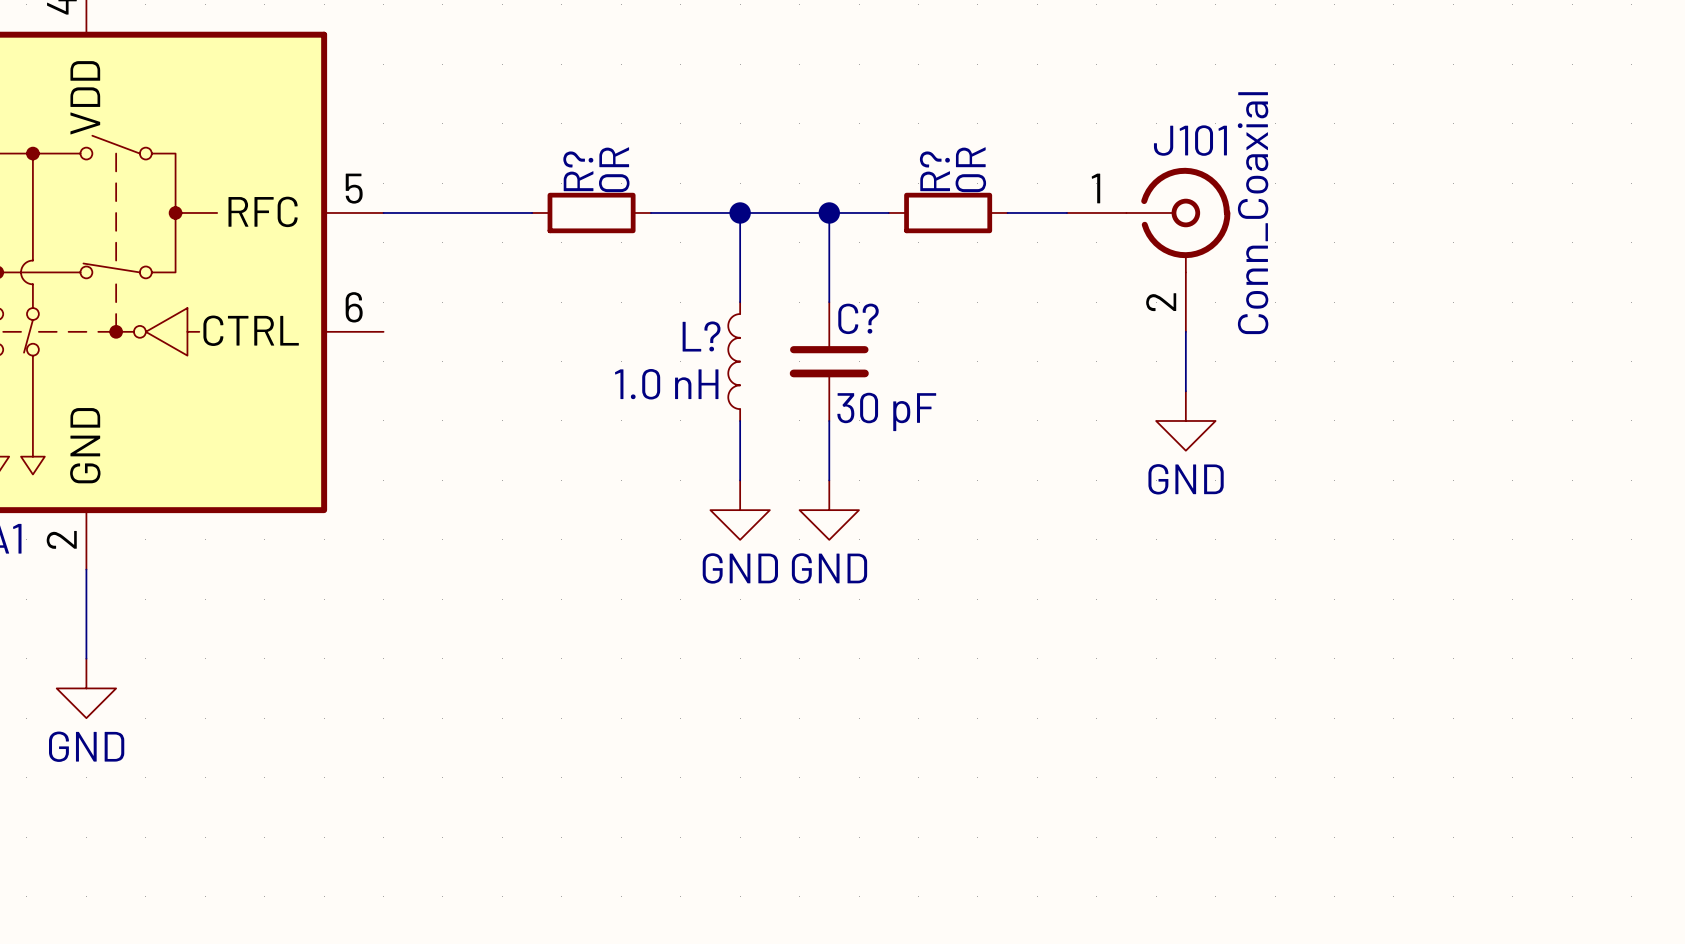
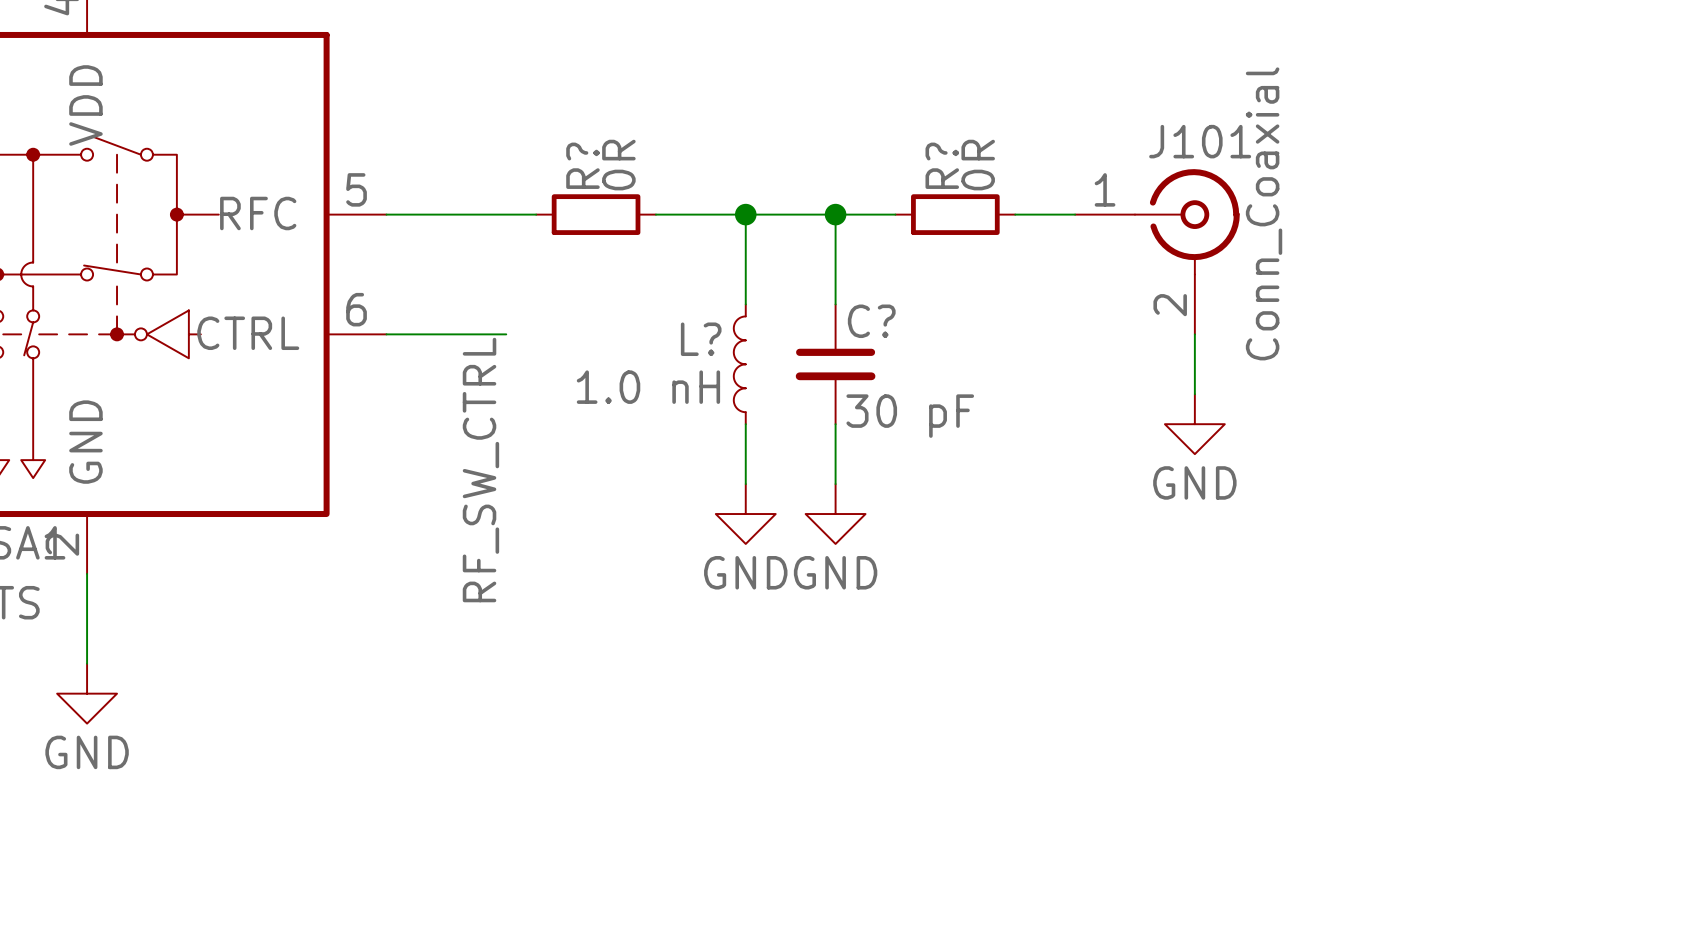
wire: none -> (386, 334) (506, 334)
label: none -> RF_SW_CTRL (480, 470)

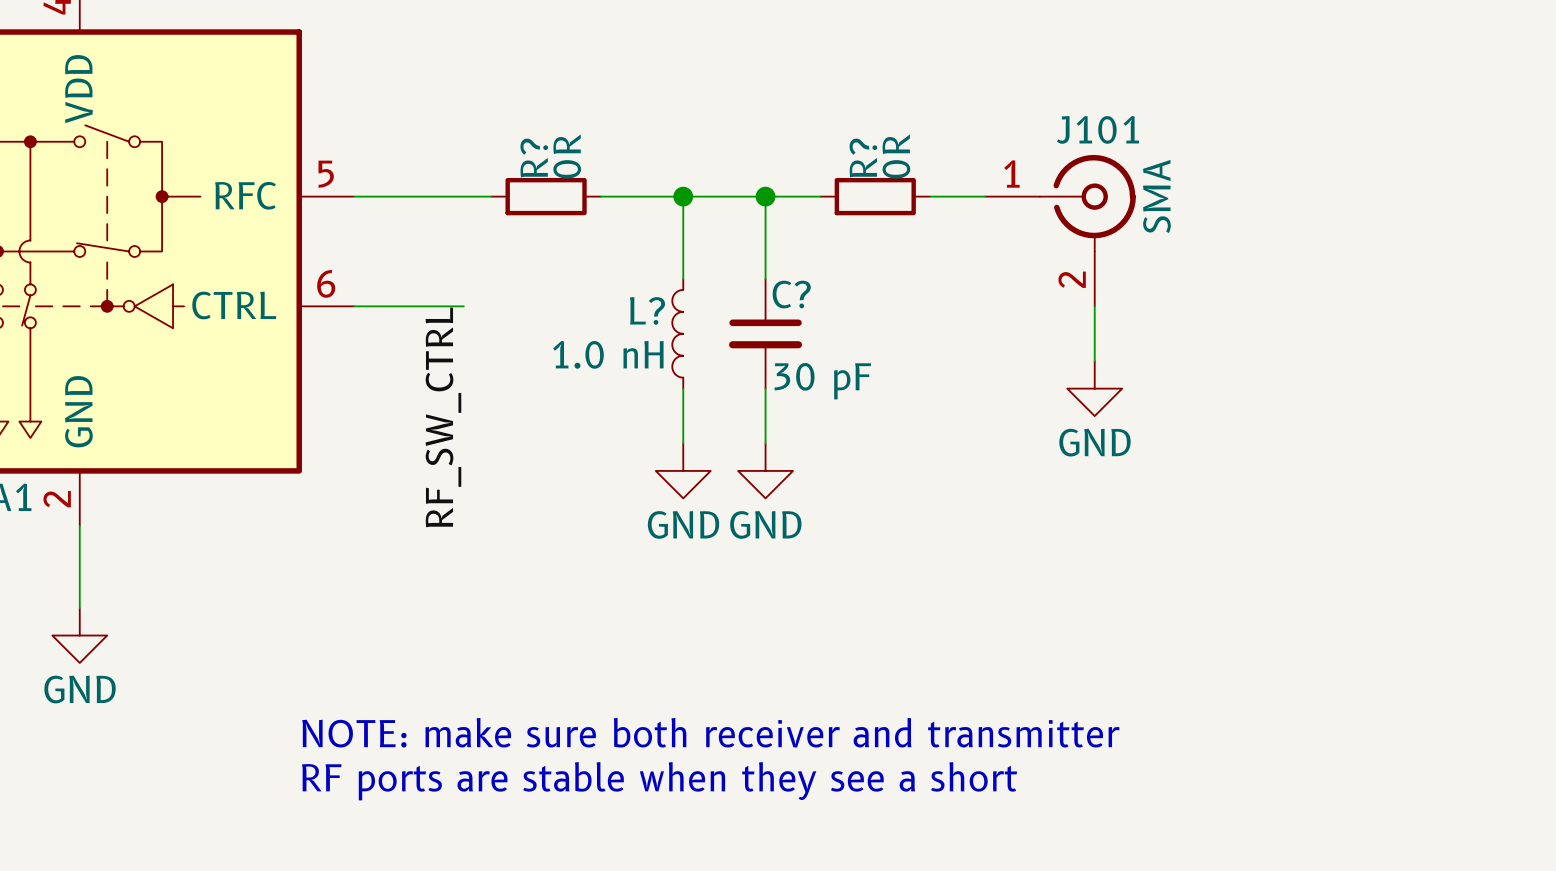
J101 value: Conn_Coaxial (1264, 213) -> SMA (1156, 196)
text: none -> NOTE: make sure both receiver and transmitter (710, 732)
text: none -> RF ports are stable when they see a short (659, 781)

